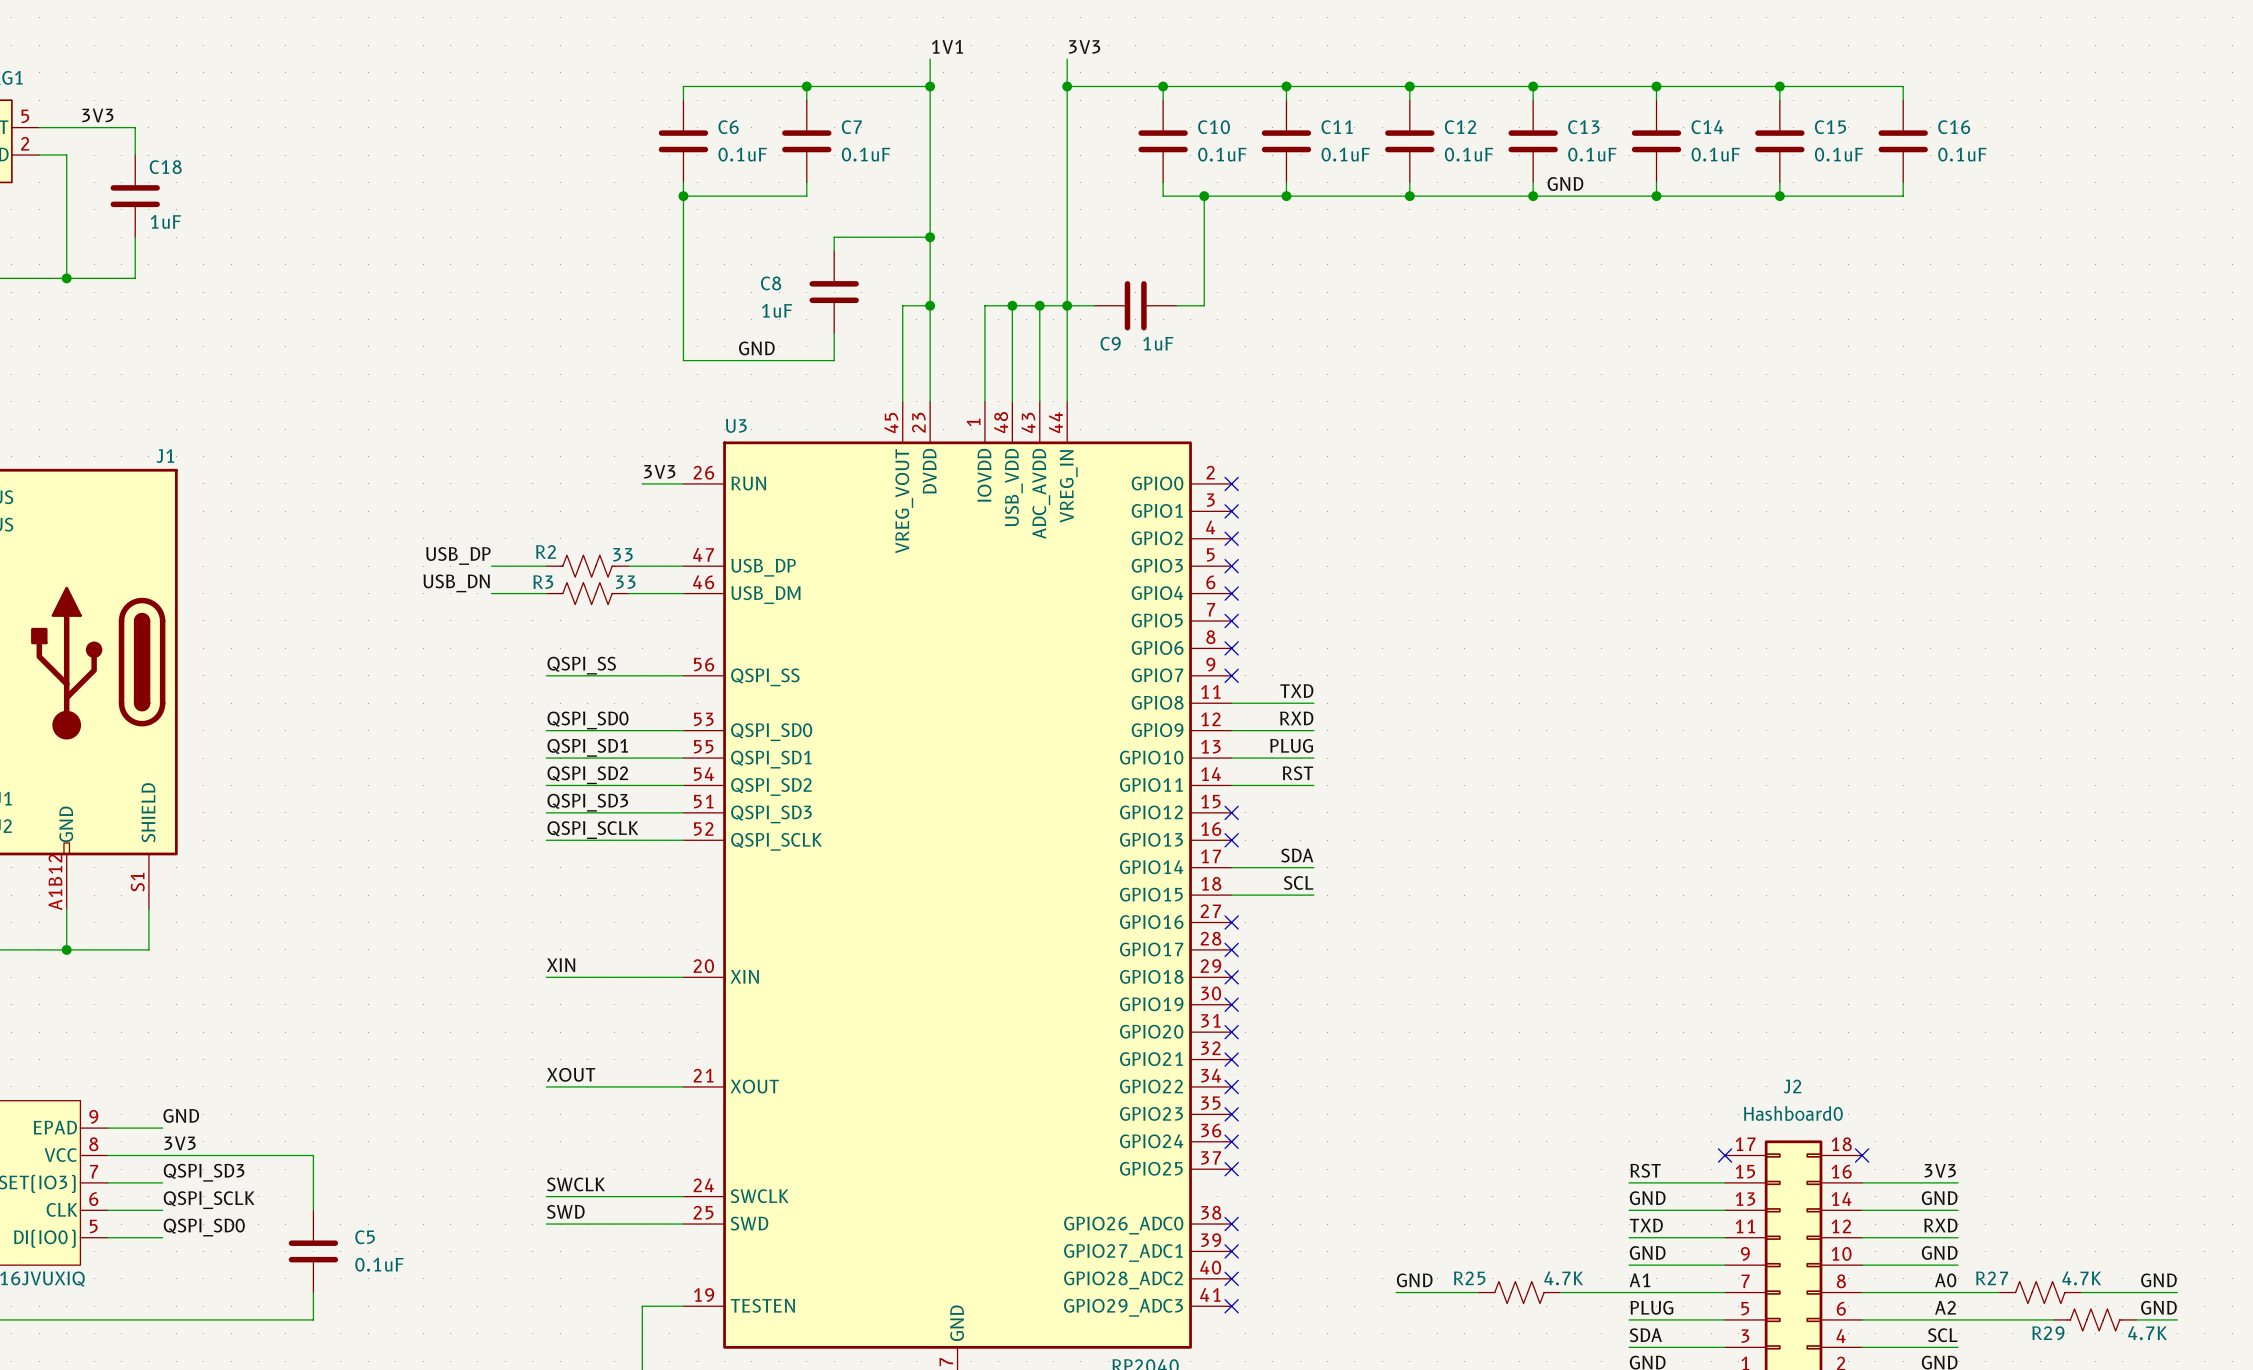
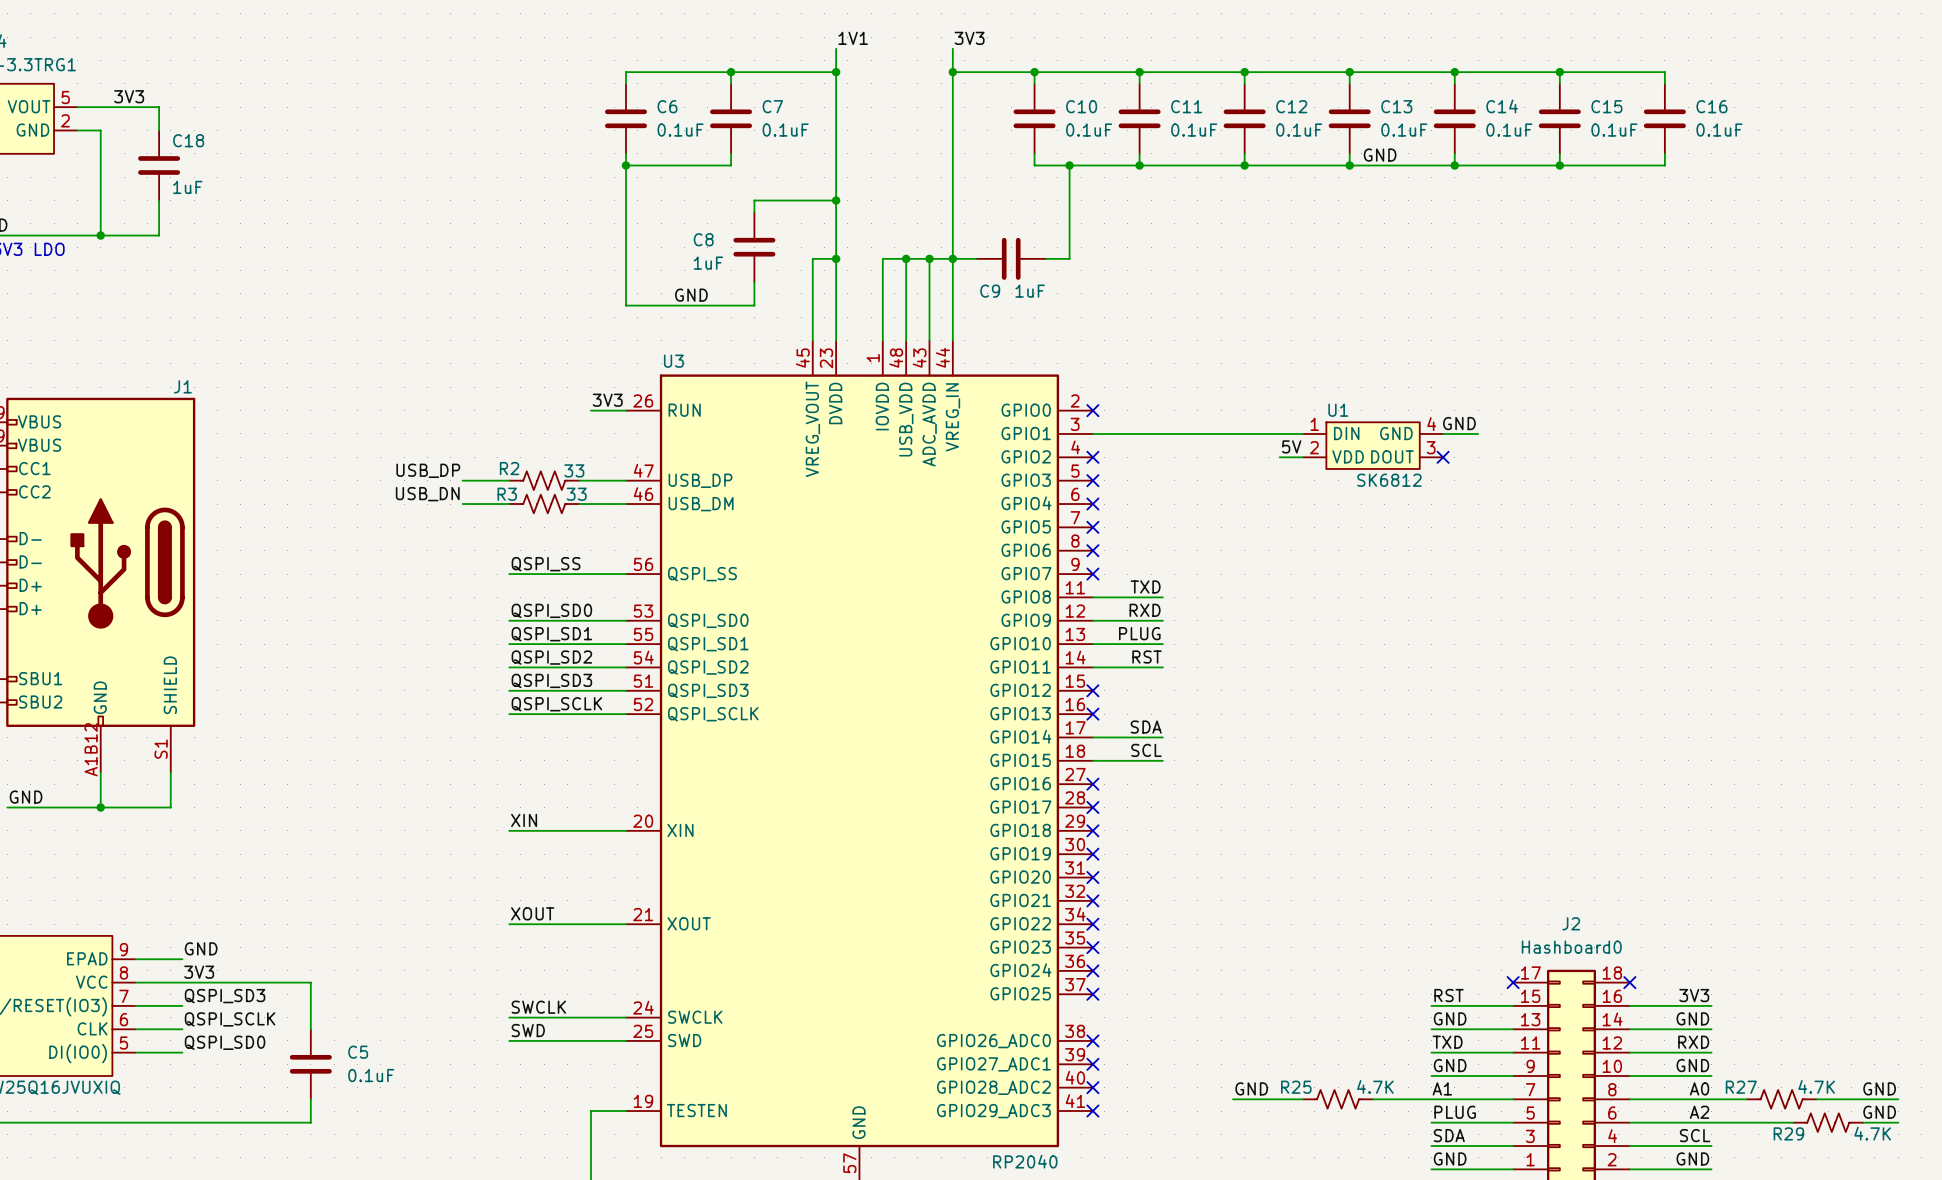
label: none -> GND (1459, 423)
wire: none -> (1092, 433) (1303, 433)
no-connect mark: (1231, 511) -> none
wire: none -> (1443, 433) (1478, 433)
U1: none -> SK6812 (1373, 445)
label: none -> 5V (1291, 446)
wire: none -> (1279, 457) (1303, 457)
no-connect mark: none -> (1443, 457)

